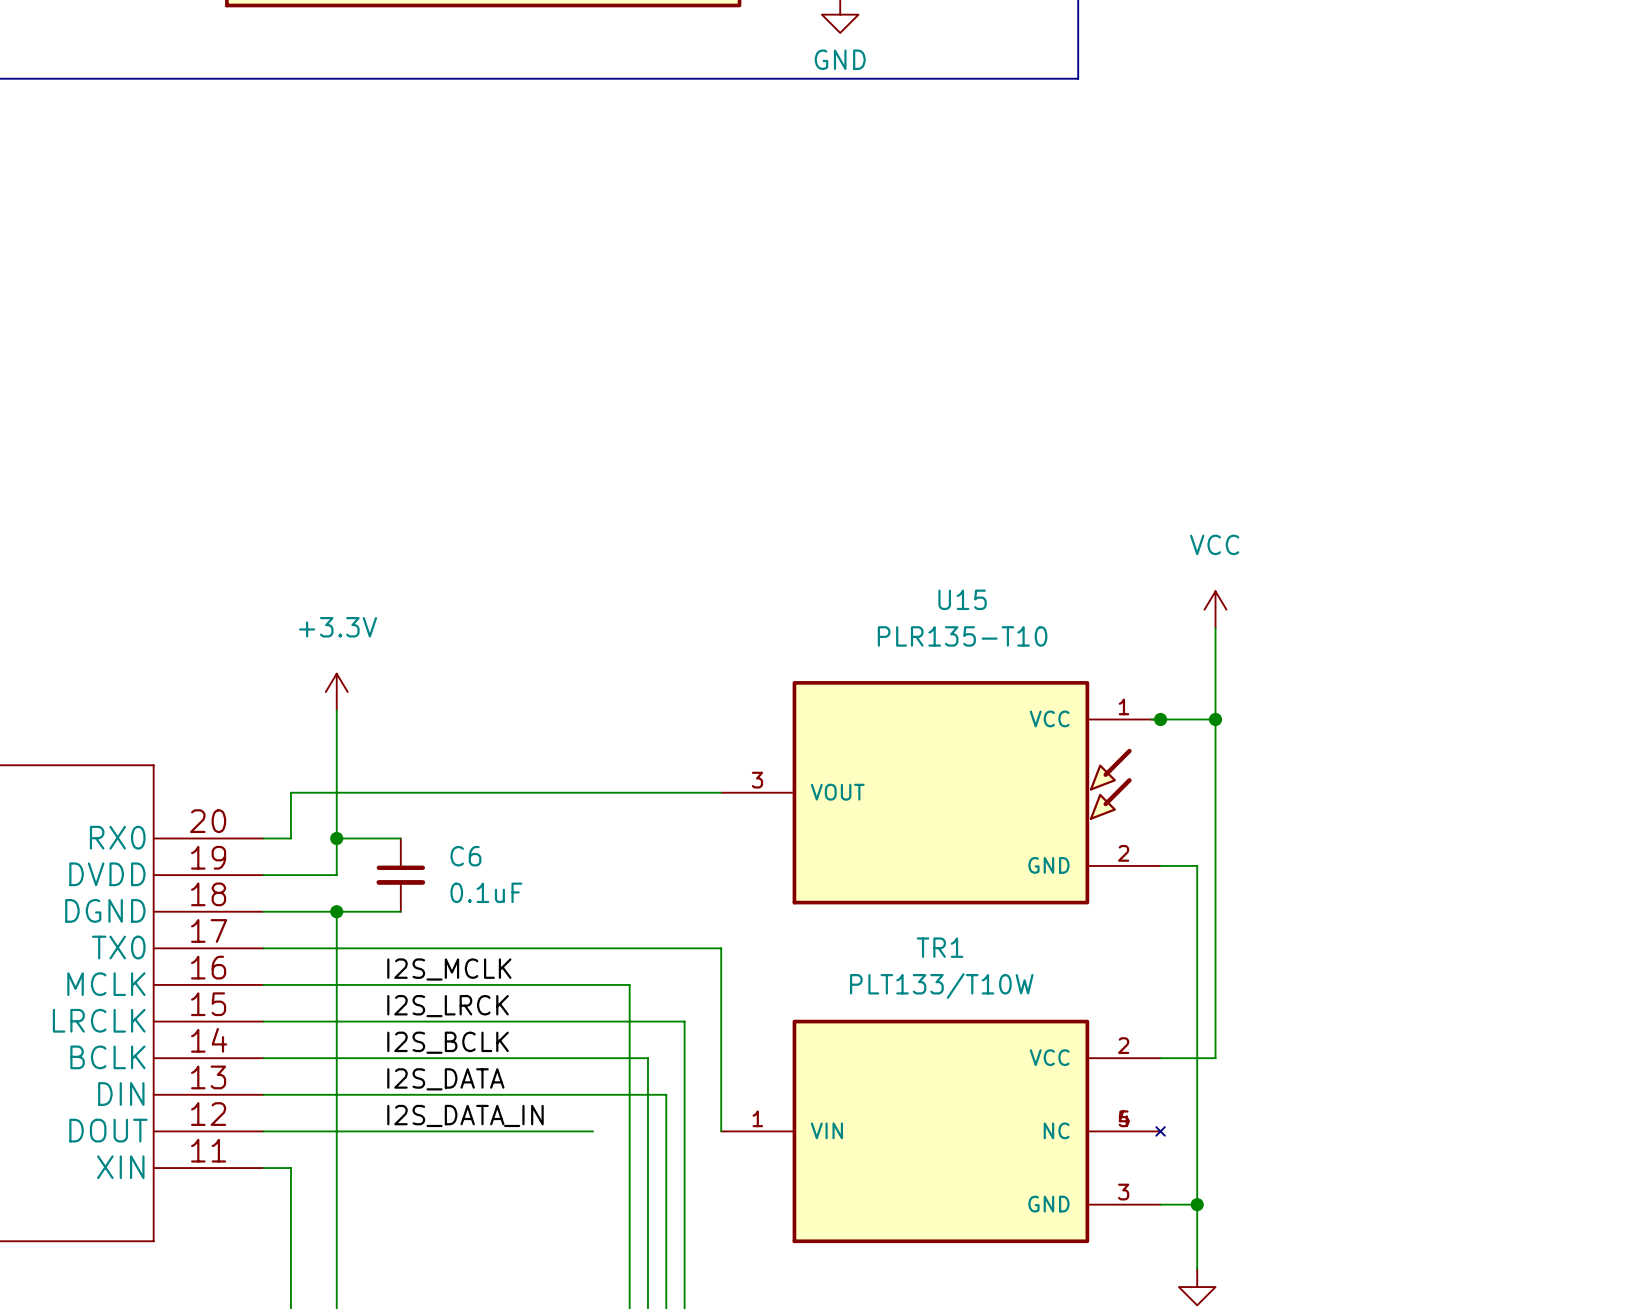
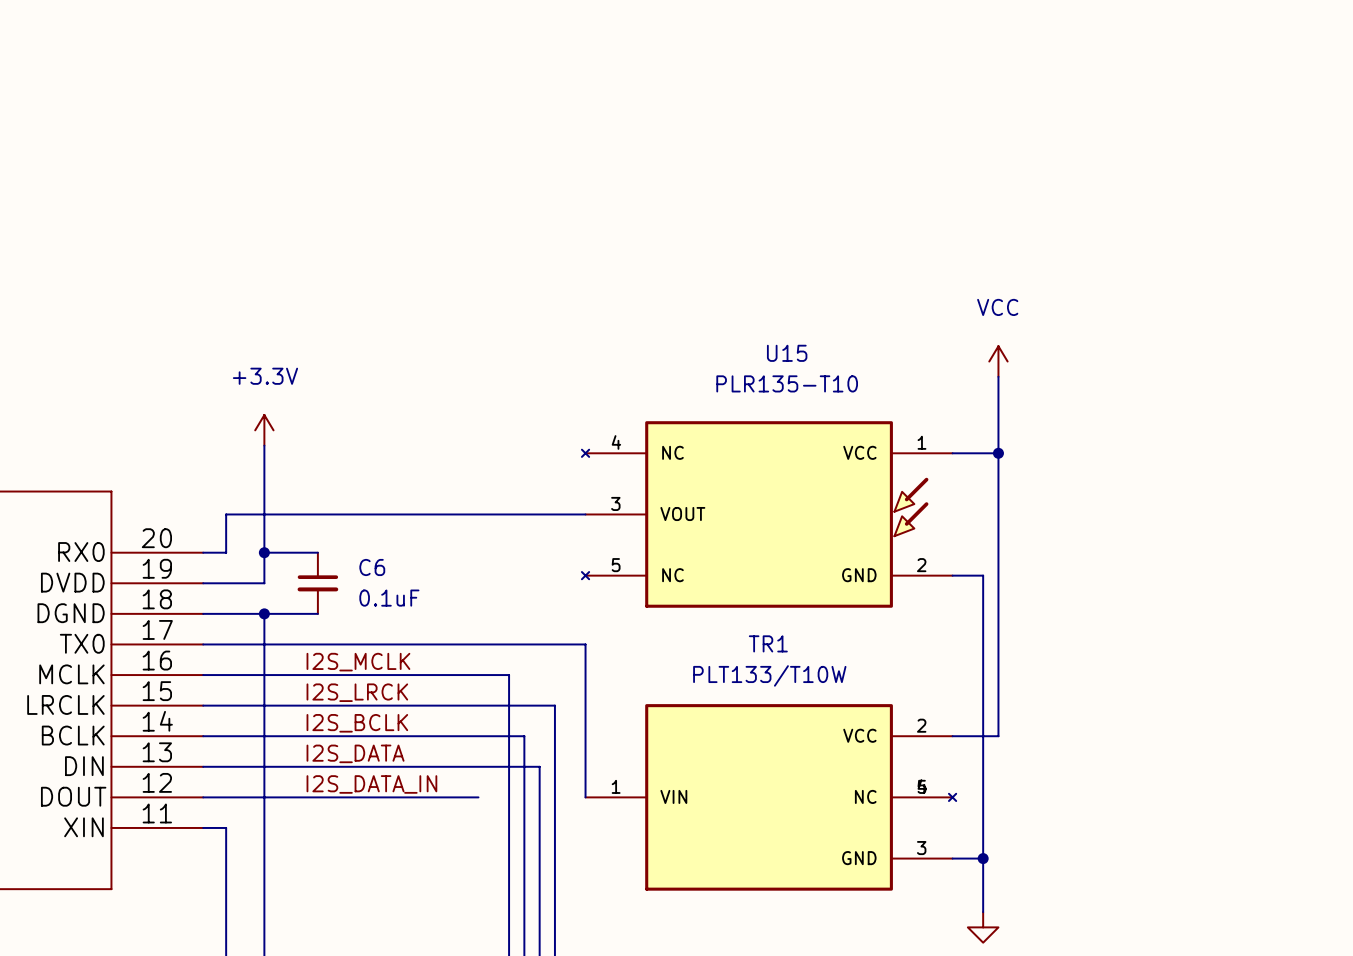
U15 symbol: [721, 681, 1161, 905] -> [581, 421, 953, 608]
junction: (1160, 719) -> none

